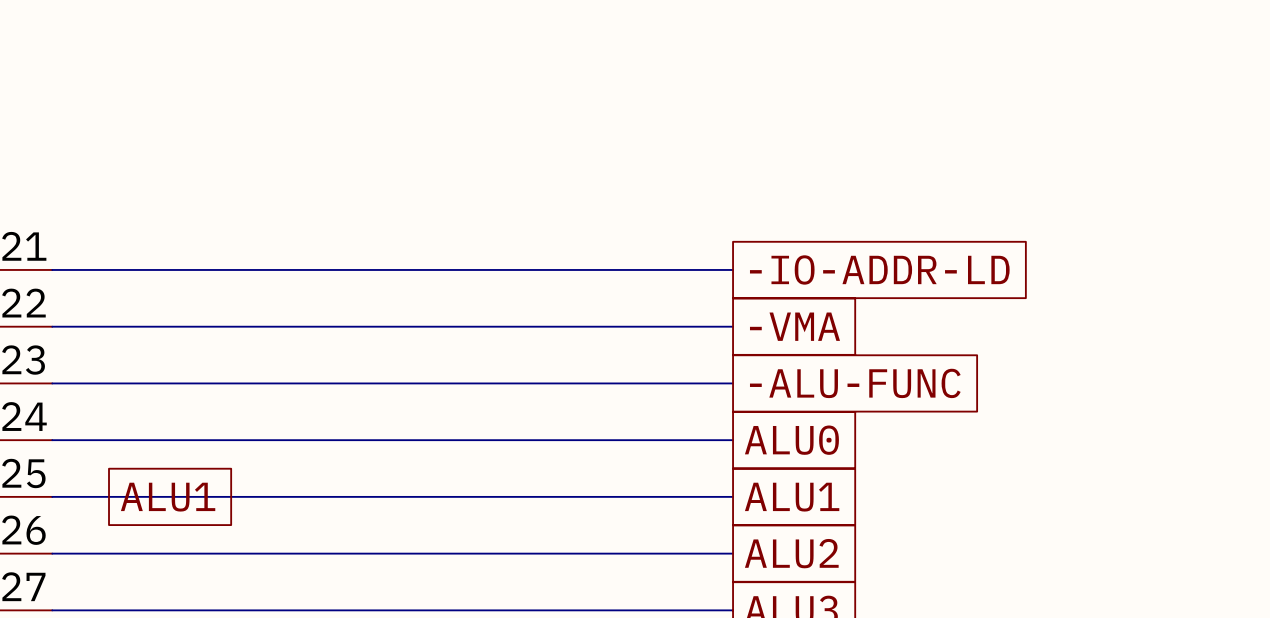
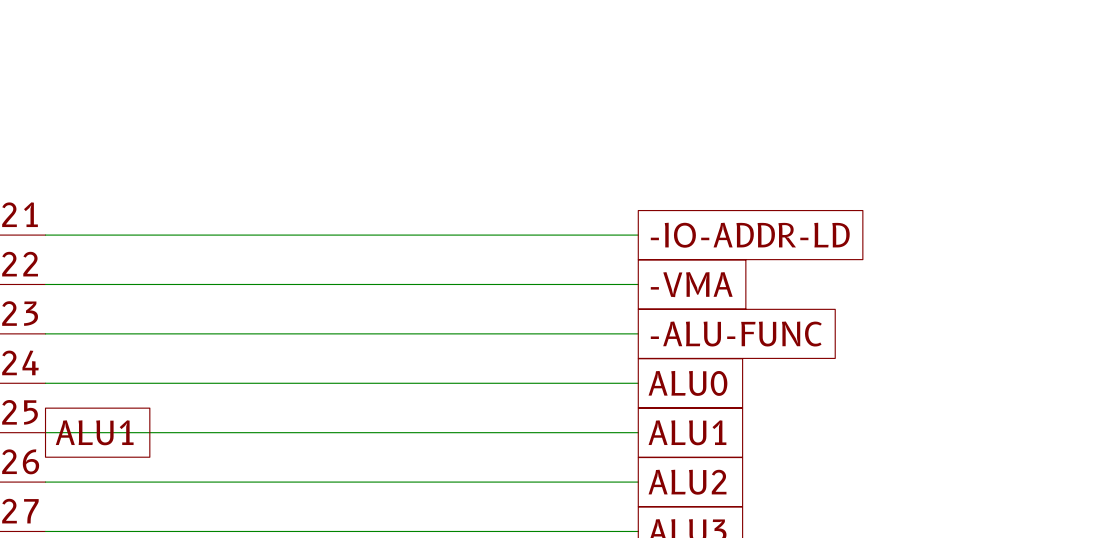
global label position: ALU1 (168, 497) -> ALU1 (94, 432)

